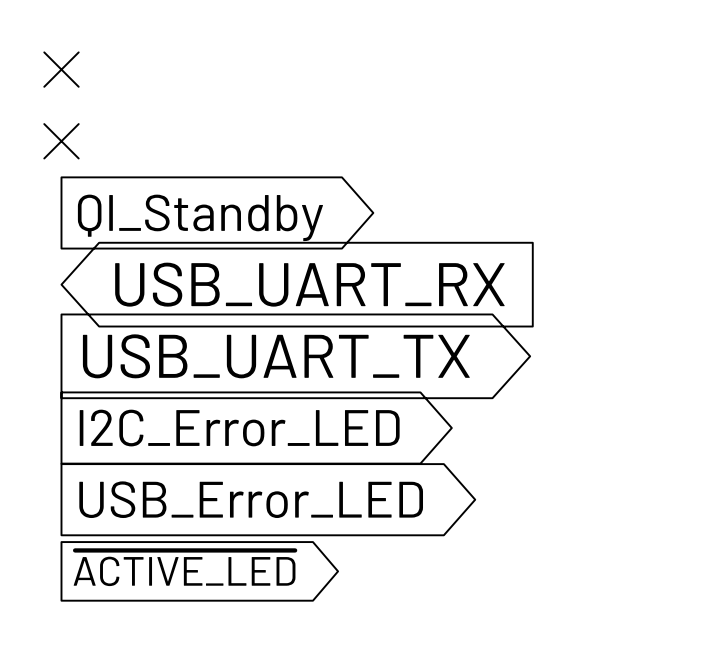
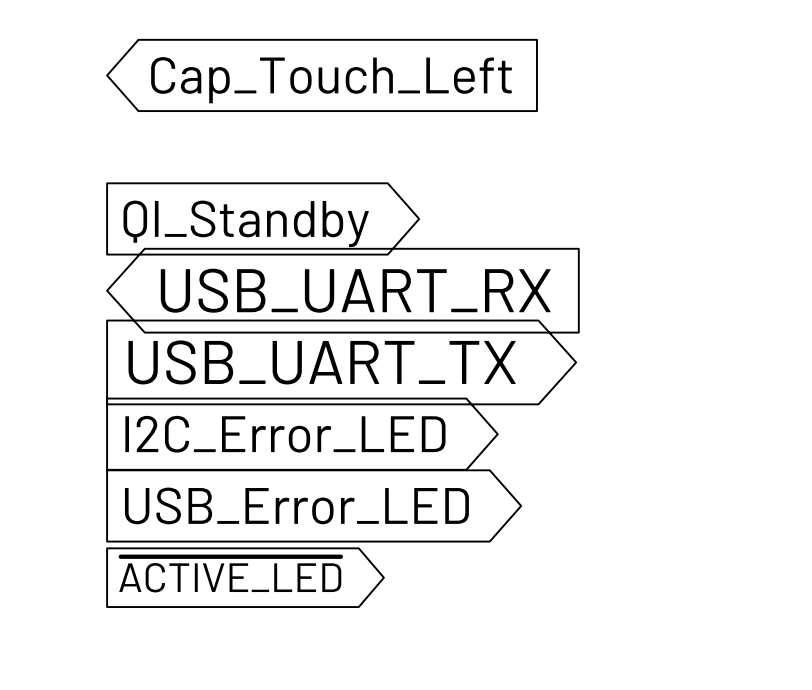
no-connect mark: (61, 69) -> none
global label: none -> Cap_Touch_Left (331, 80)
no-connect mark: (61, 141) -> none

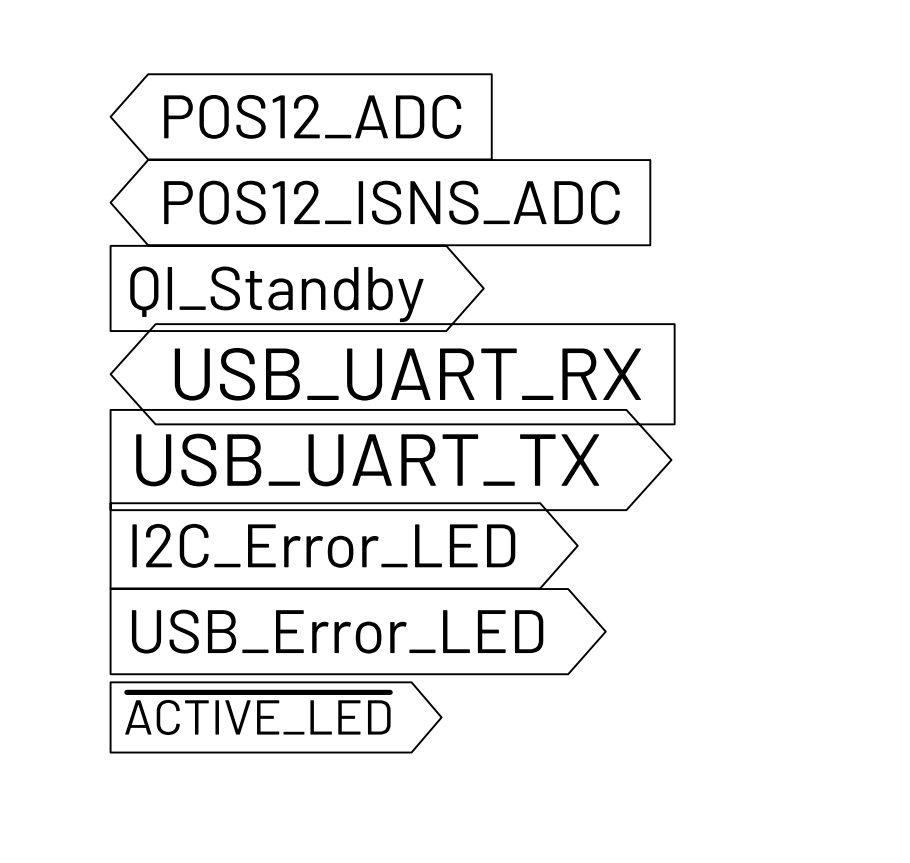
global label: Cap_Touch_Left (331, 80) -> POS12_ADC (312, 116)
global label: none -> POS12_ISNS_ADC (391, 202)

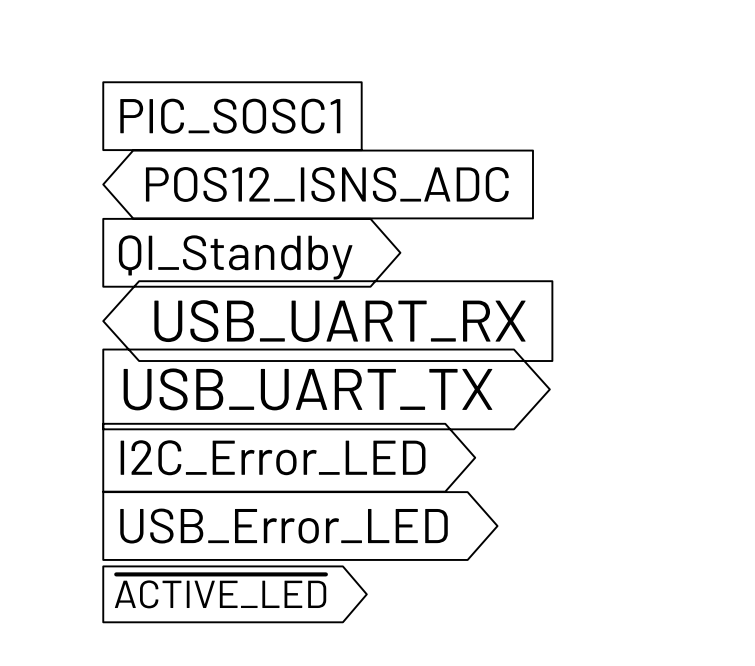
global label shape: input (312, 116) -> passive (230, 116)
global label: POS12_ADC (312, 116) -> PIC_SOSC1 (230, 116)

